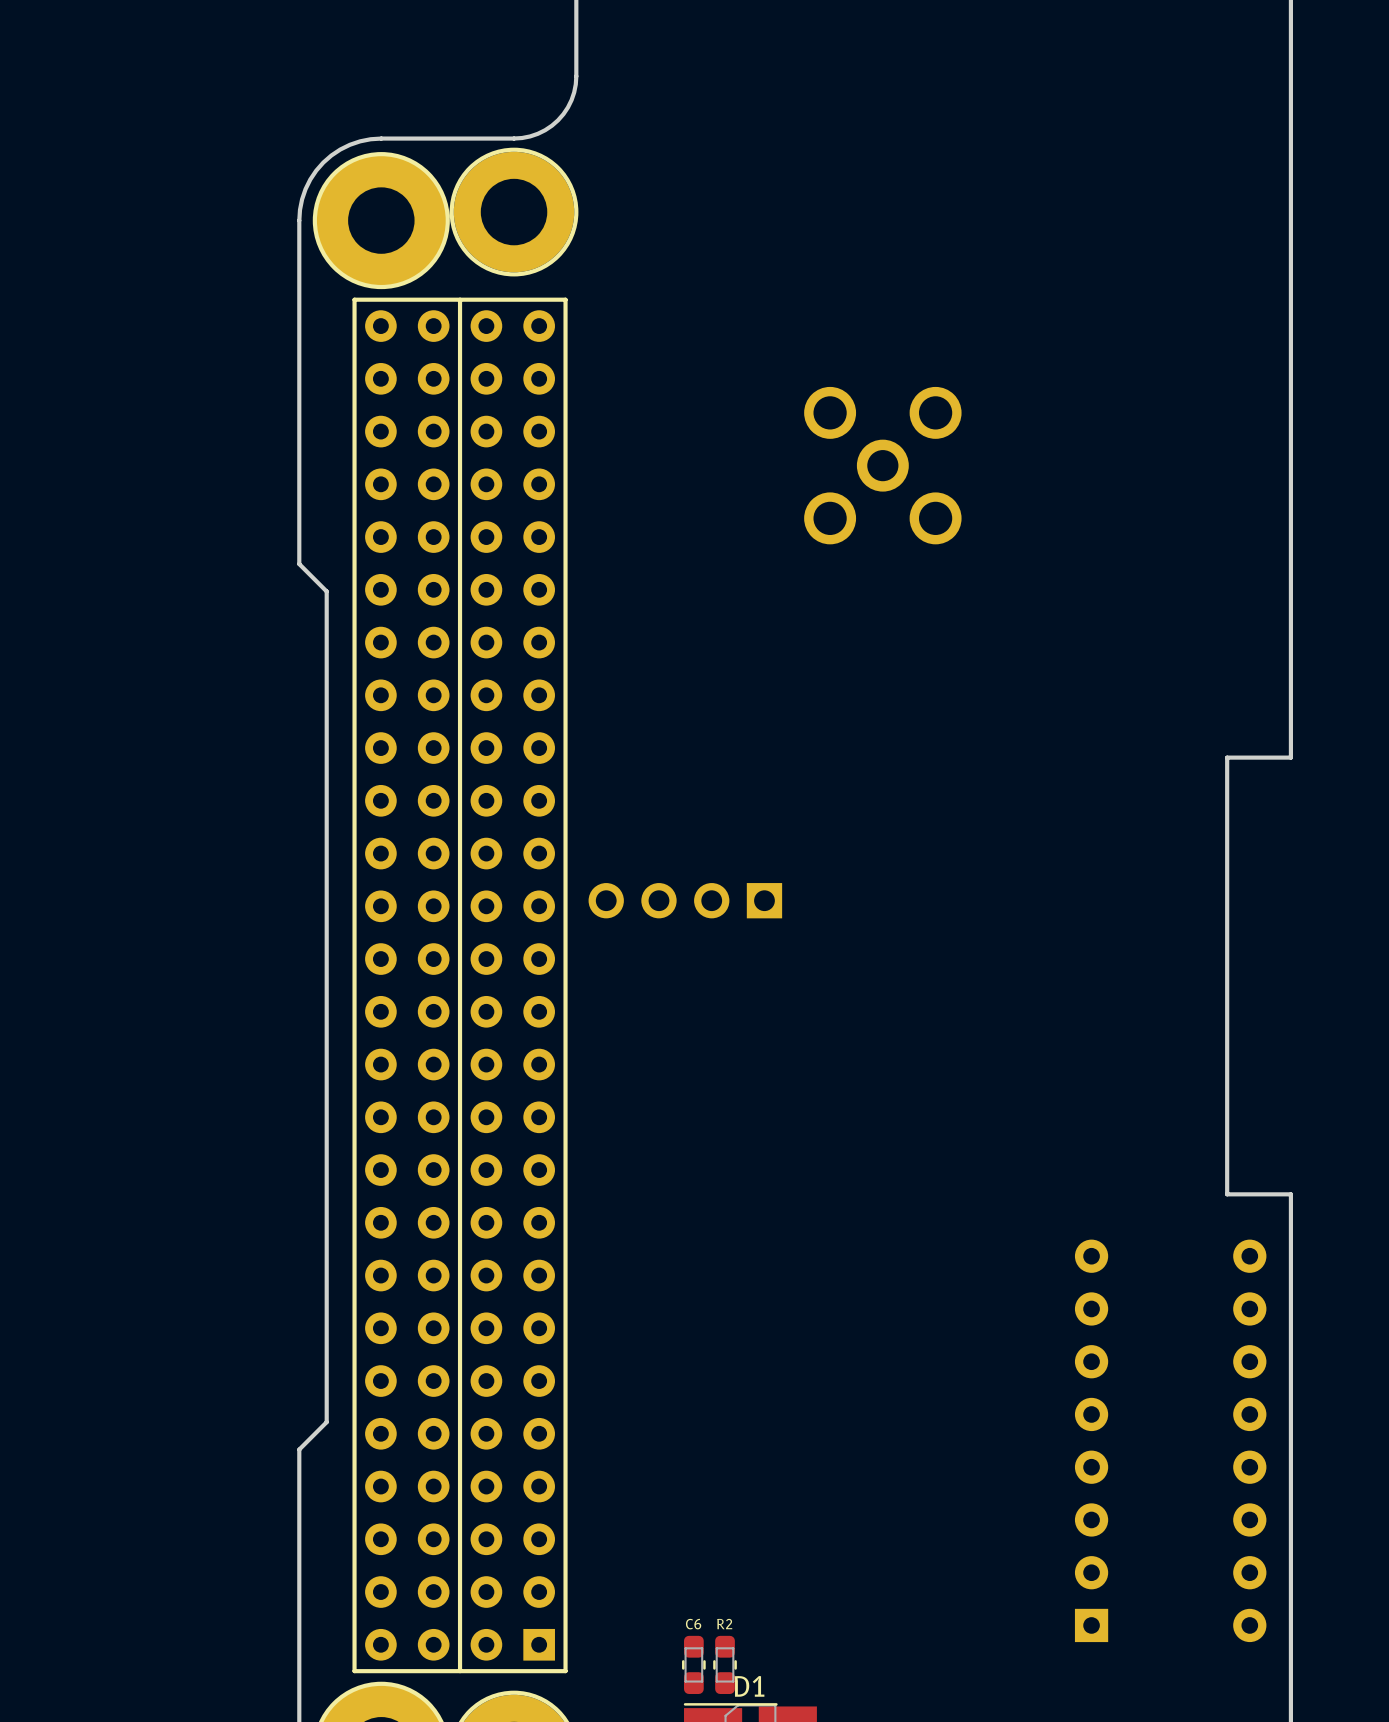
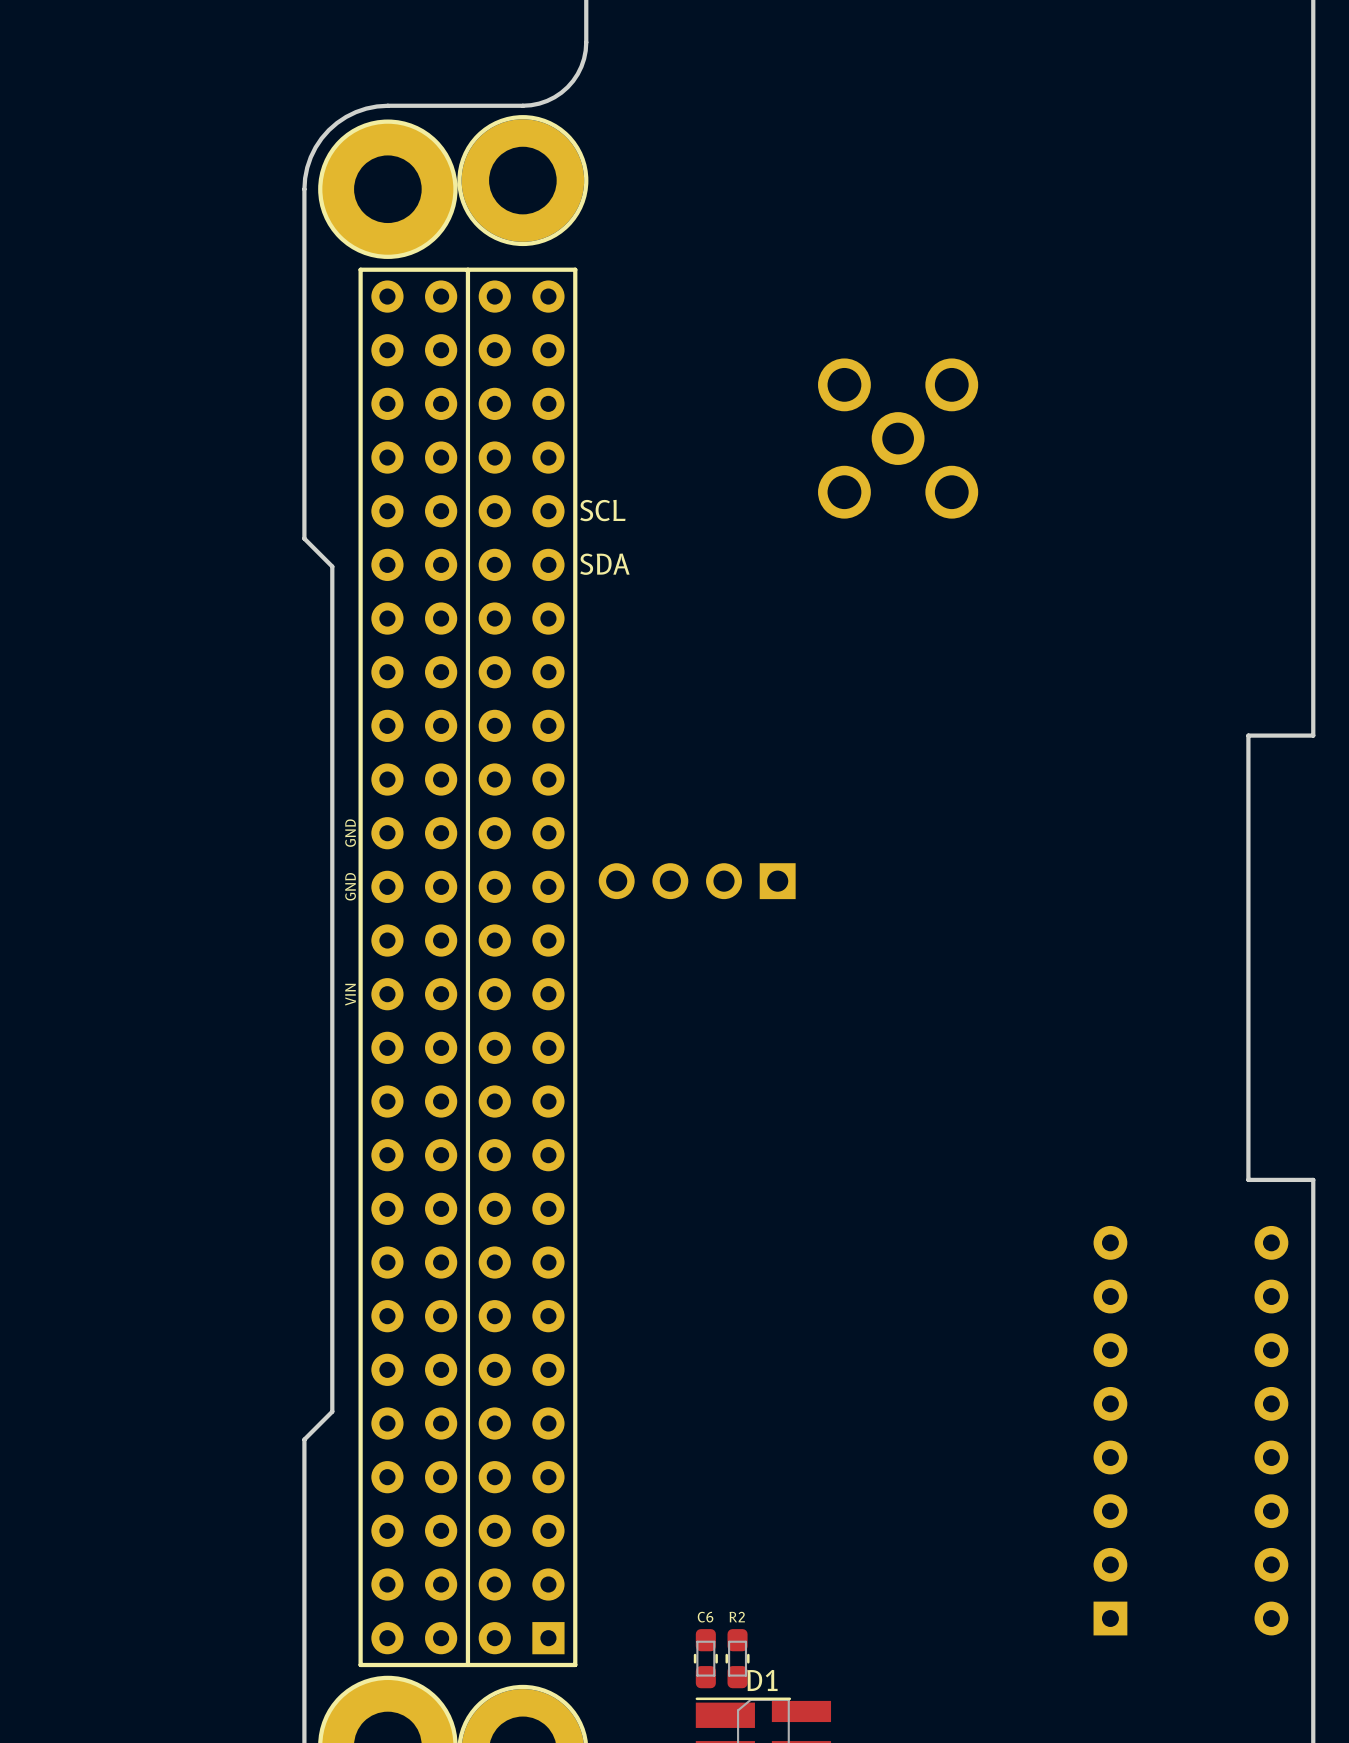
text: none -> SCL (602, 510)
text: none -> SDA (604, 564)
text: none -> GND (350, 833)
text: none -> GND (350, 886)
text: none -> VIN (350, 994)

